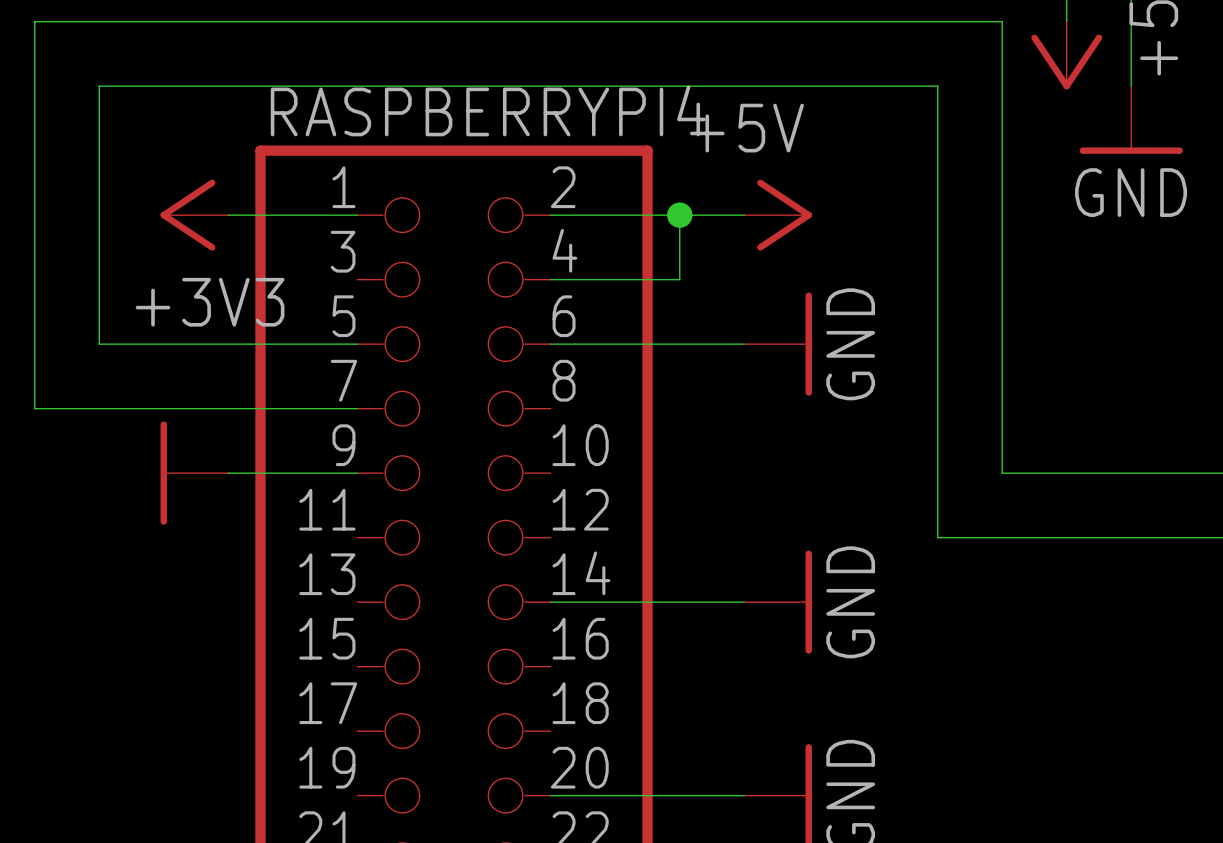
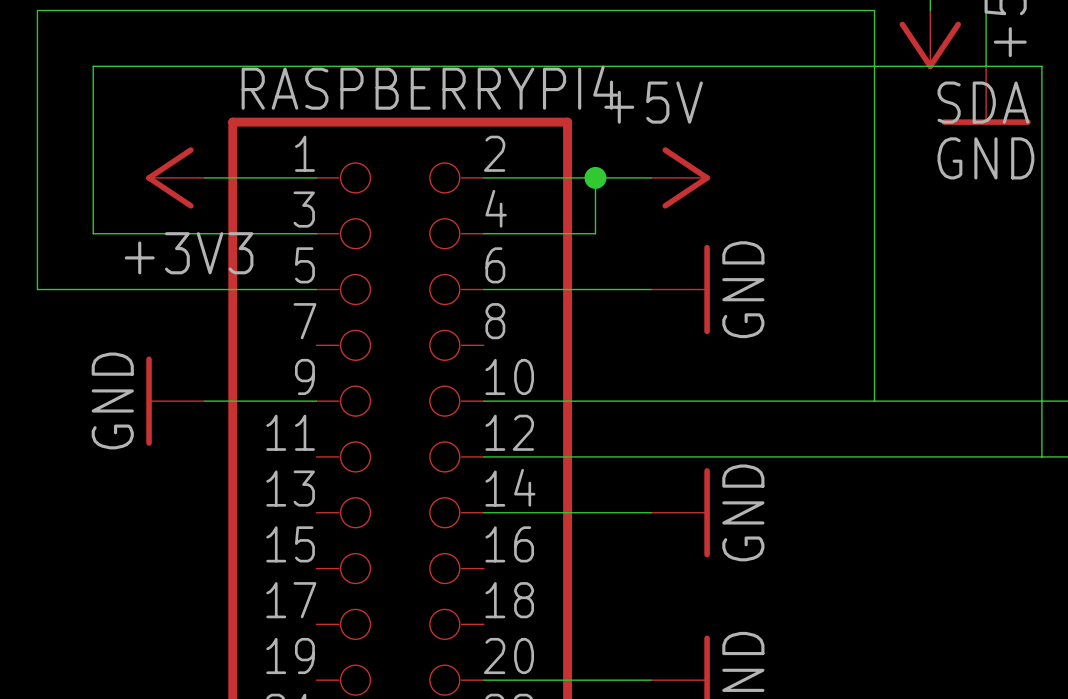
wire: (937, 86) (937, 537) -> (818, 66) (1041, 66) (1041, 456)
label: none -> SDA (983, 102)
wire: (99, 279) (99, 344) -> (37, 289) (93, 289)
wire: none -> (93, 233) (316, 233)
wire: (34, 344) (34, 408) (357, 408) -> none
power symbol text: none -> GND (112, 400)
wire: none -> (483, 401) (874, 401)
wire: none -> (483, 456) (818, 456)

